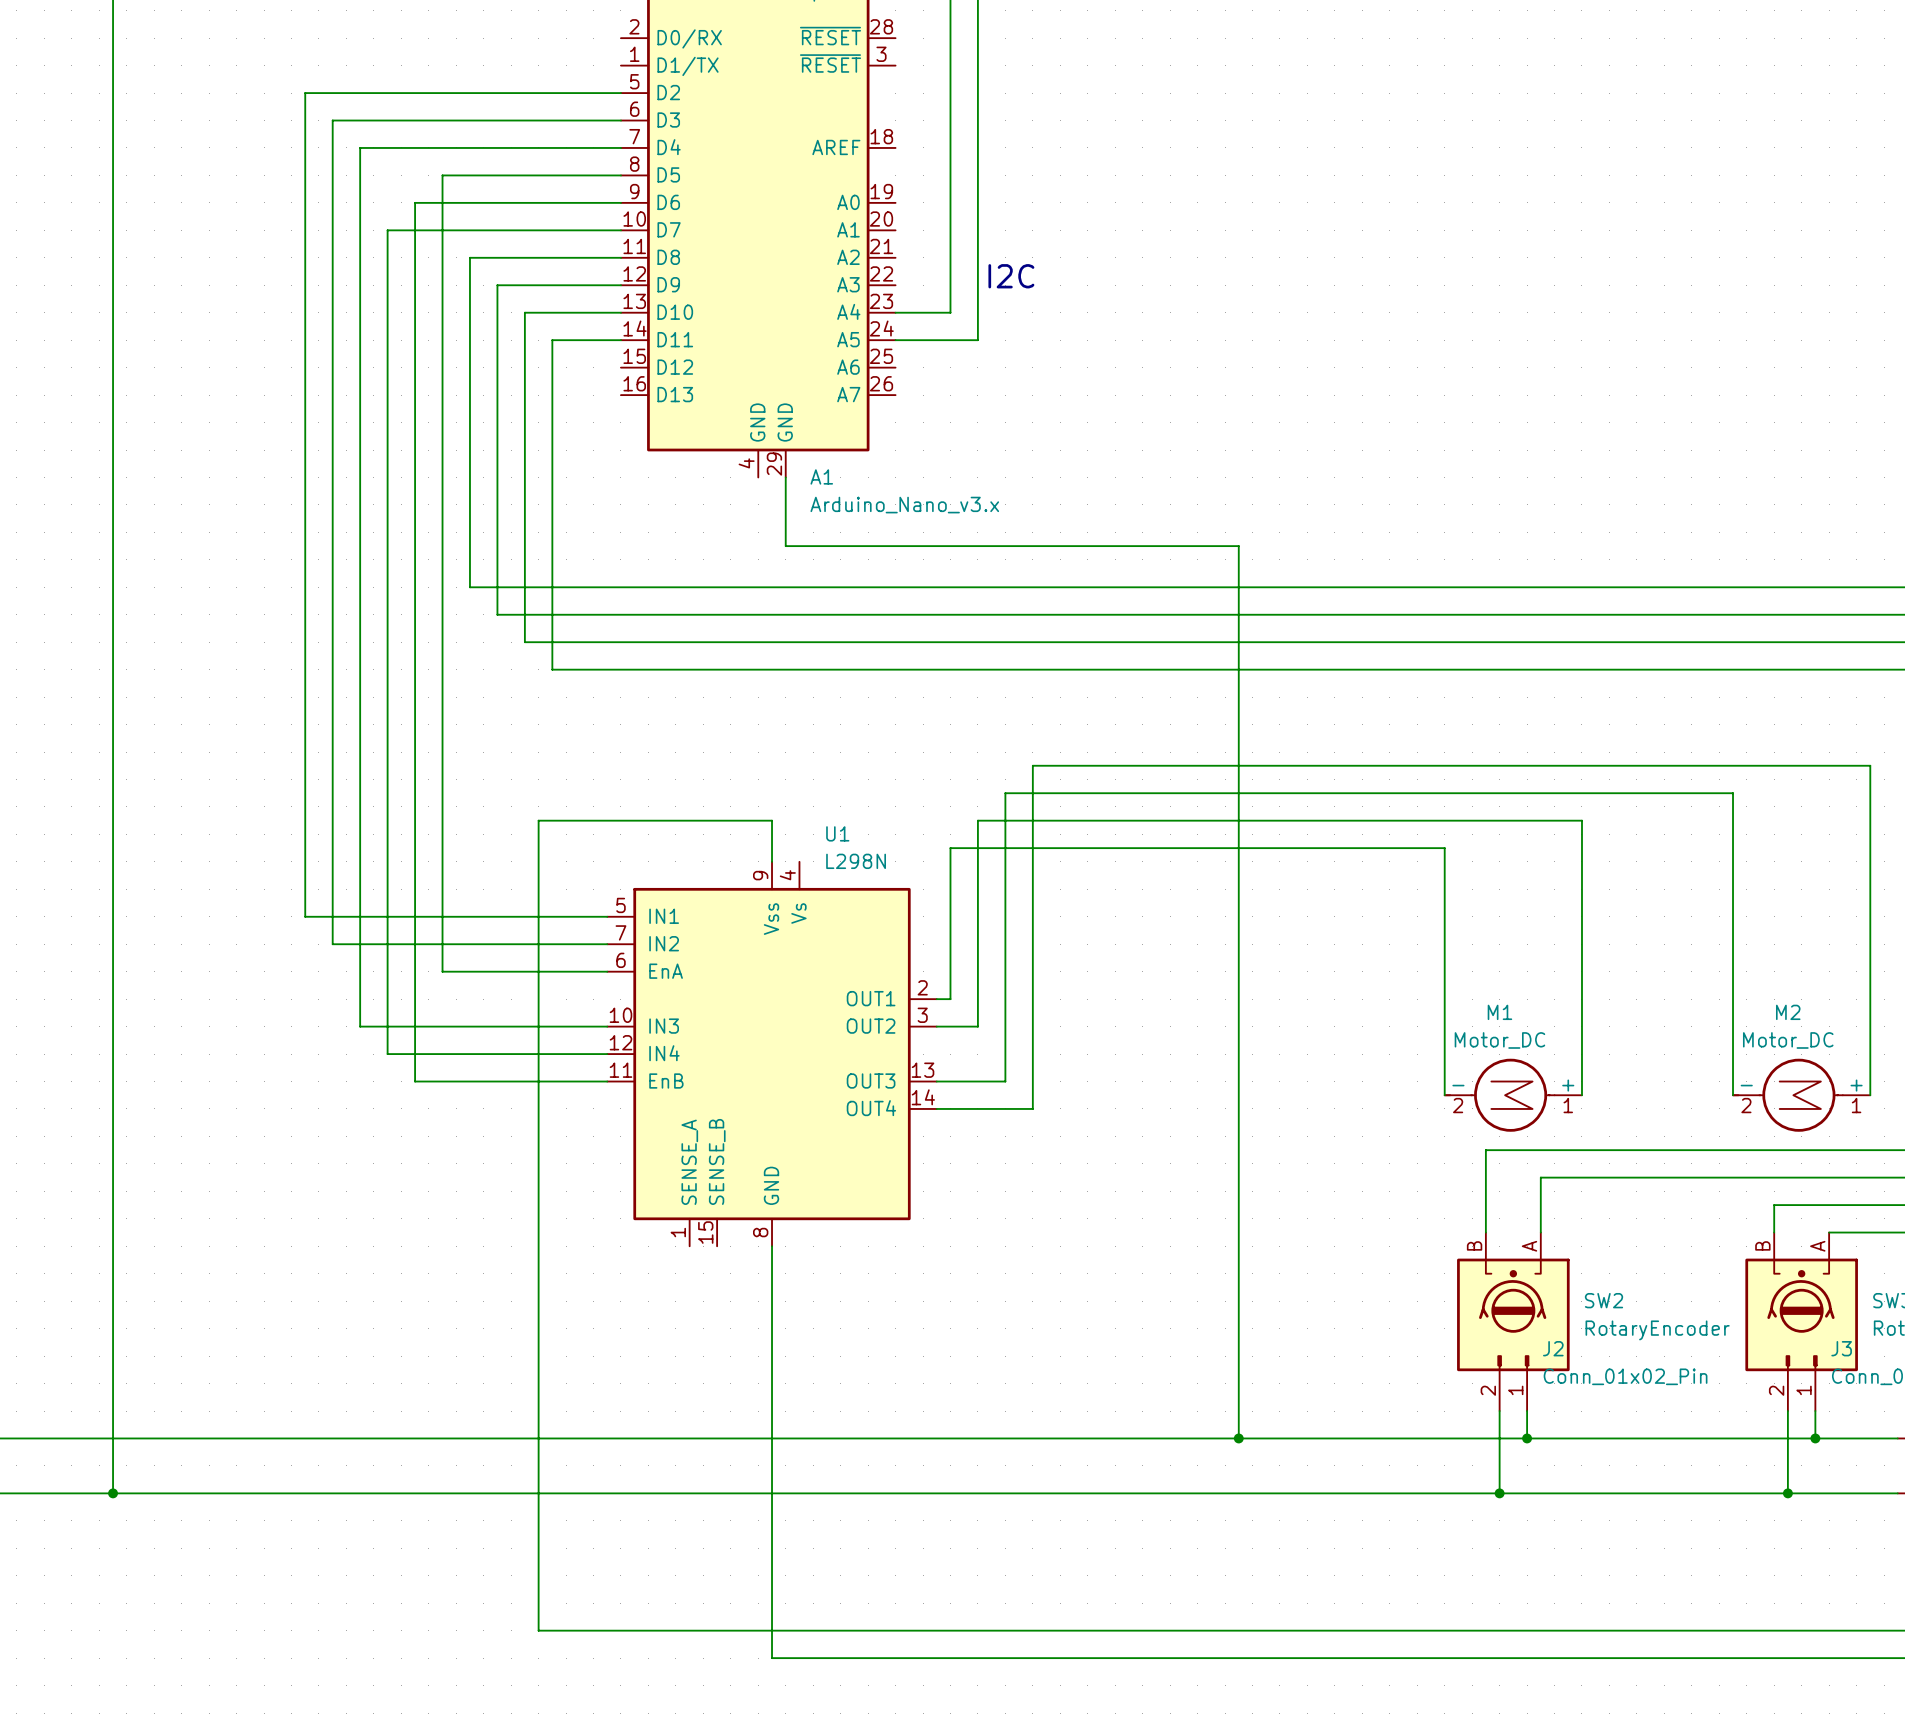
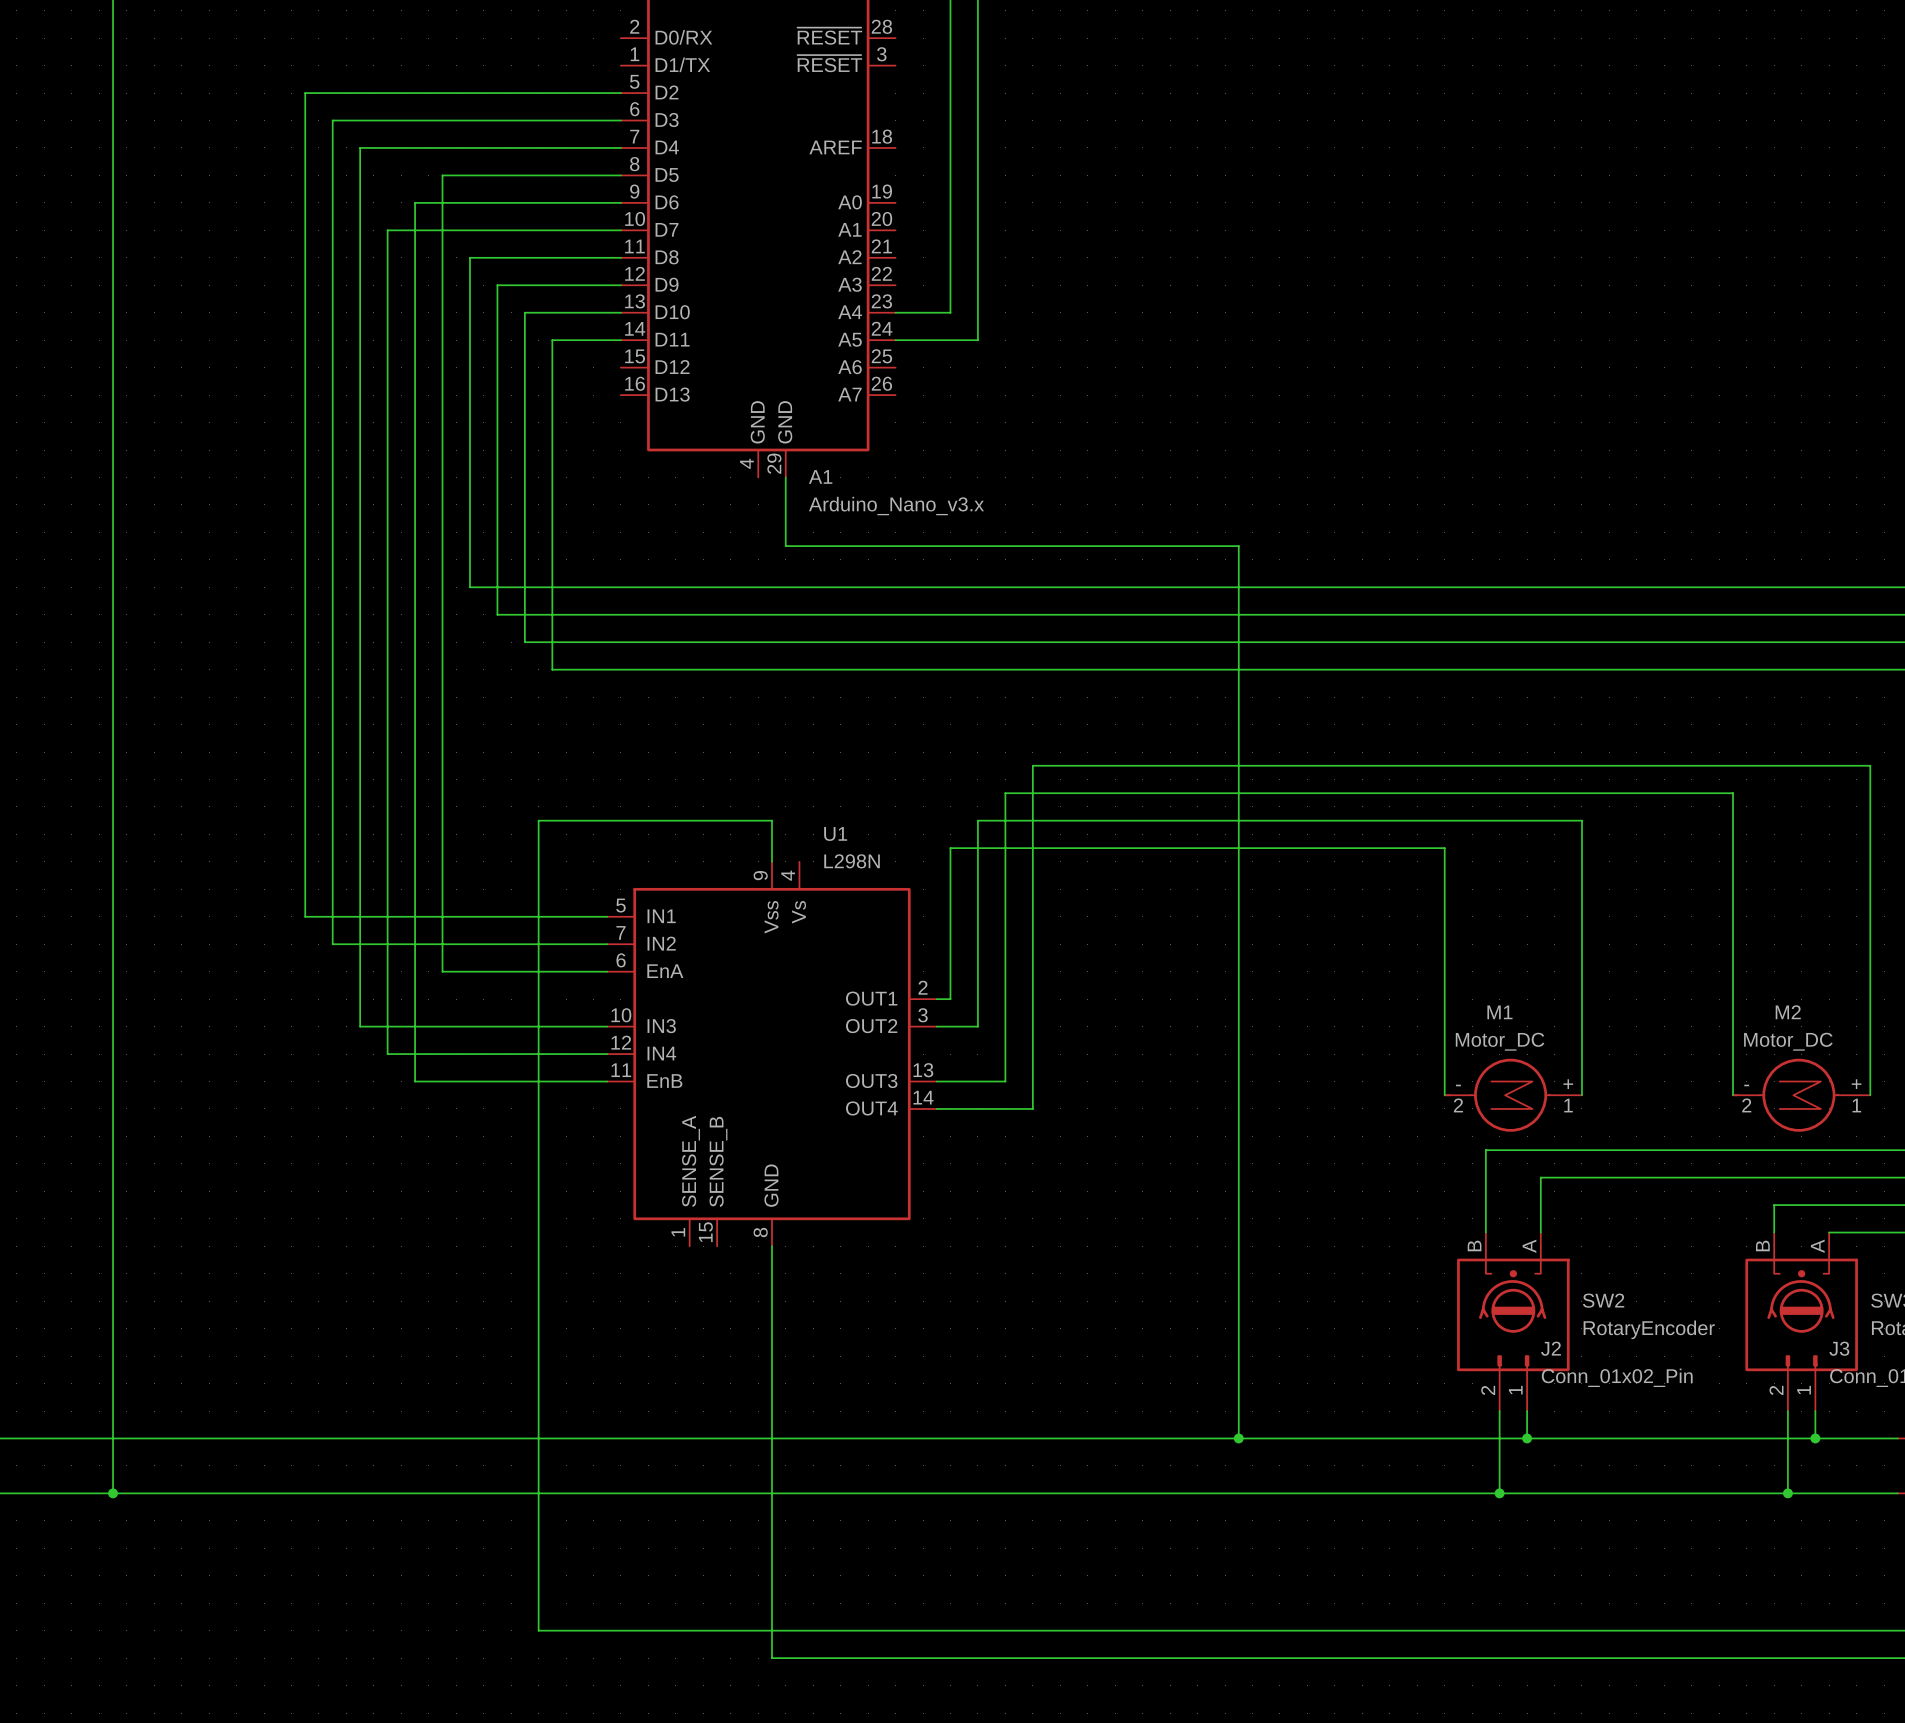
text: I2C (1011, 276) -> none

